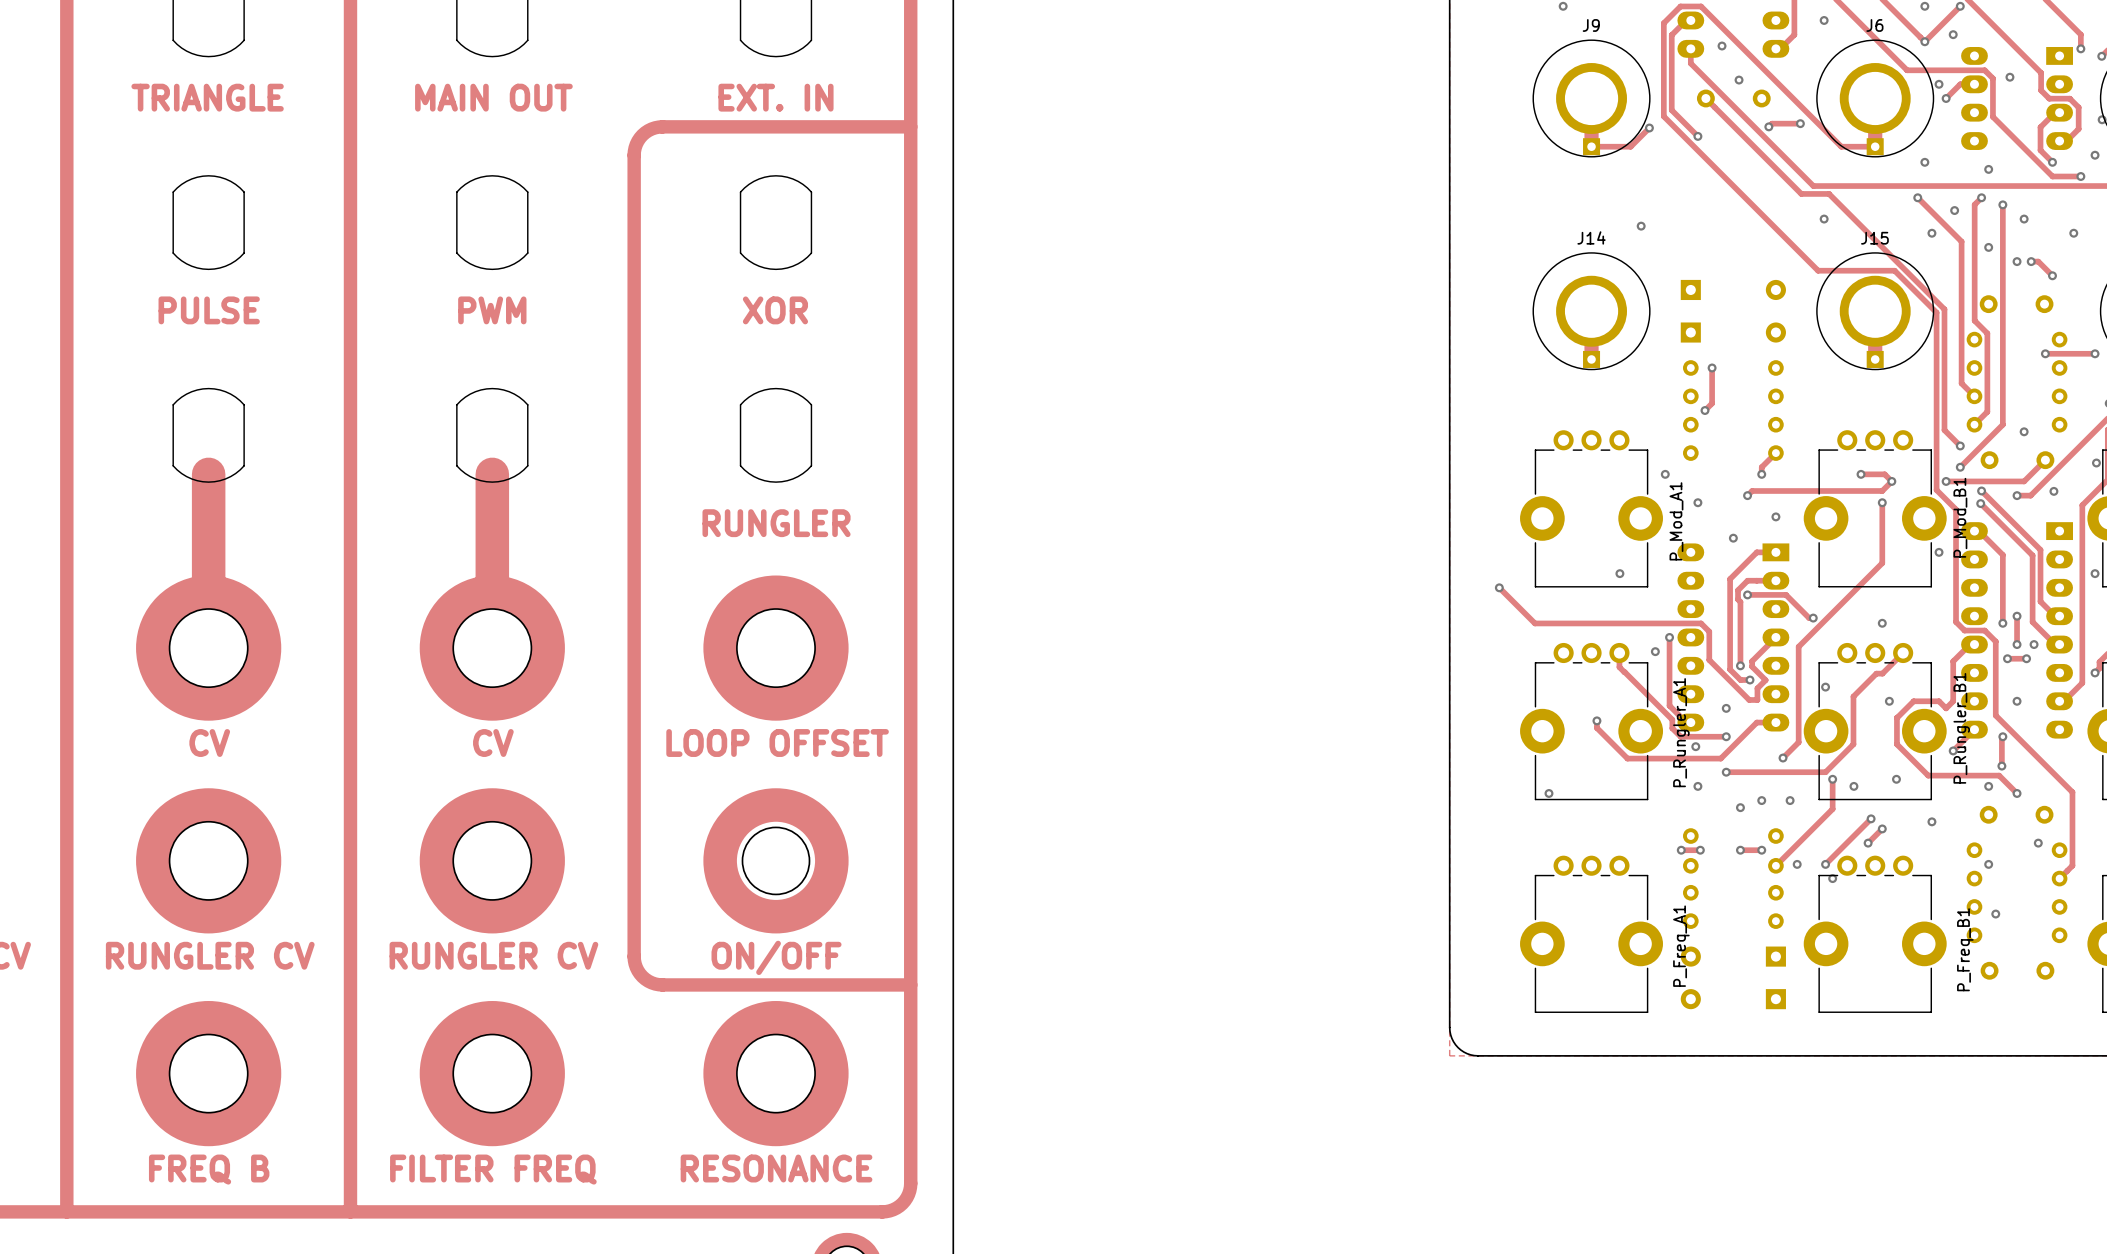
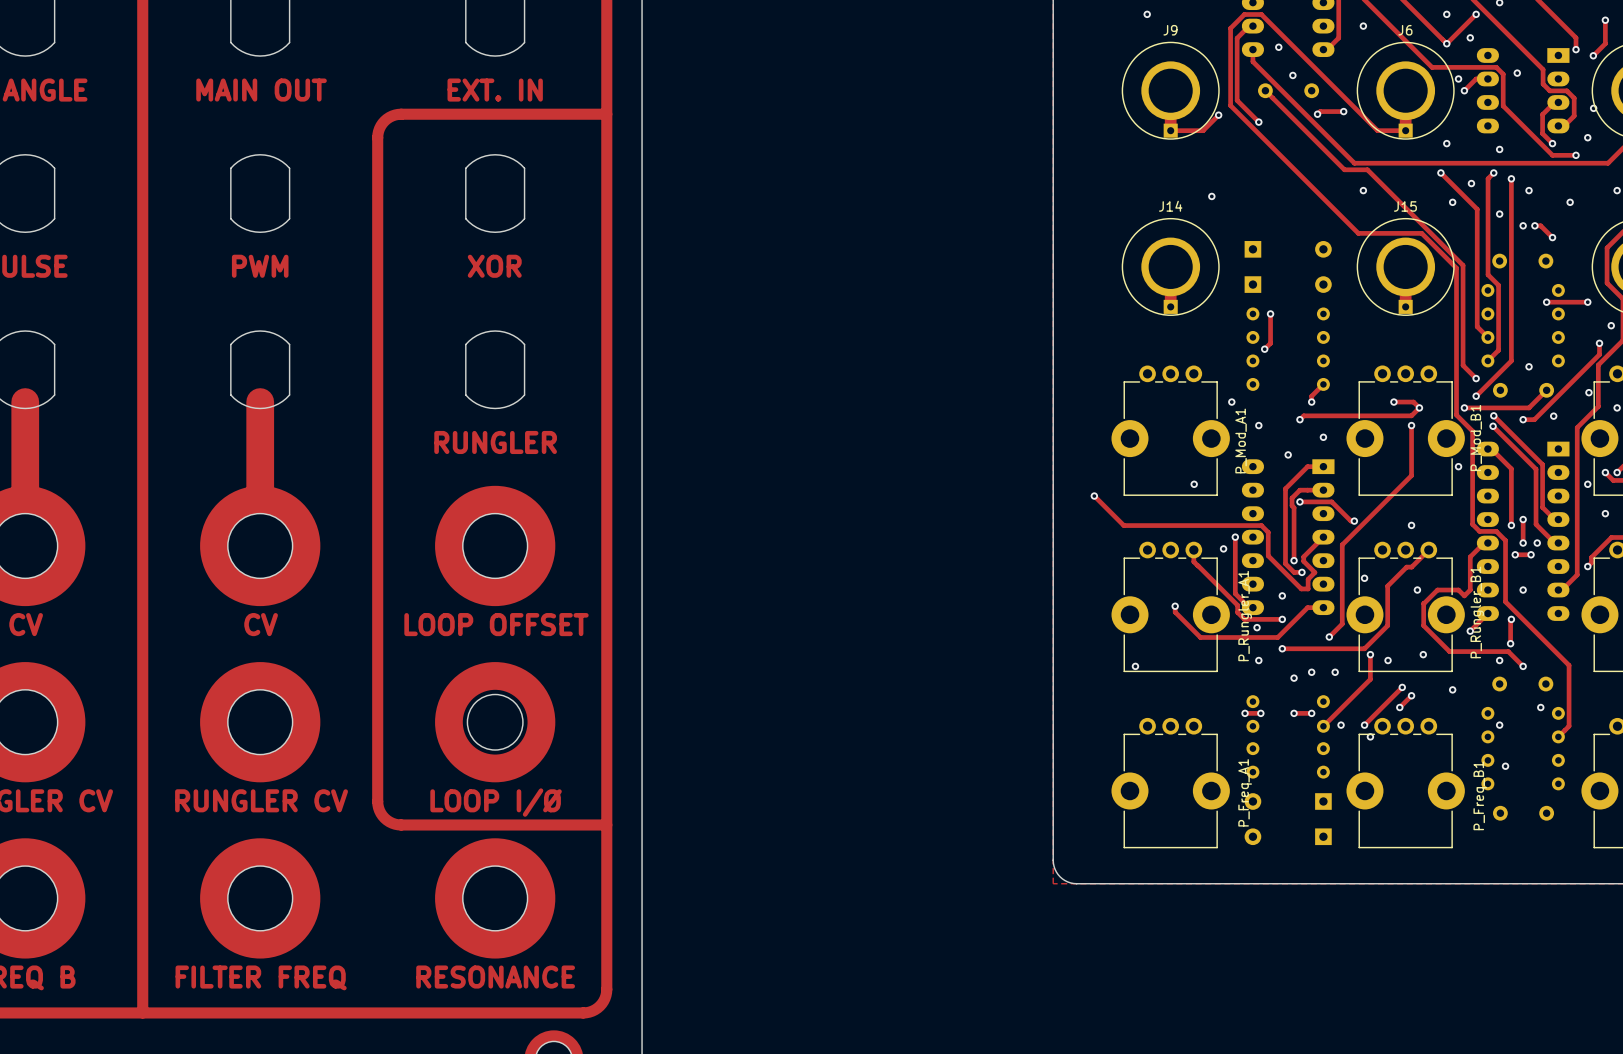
text: ON/OFF (776, 957) -> LOOP I/Ø (496, 802)

